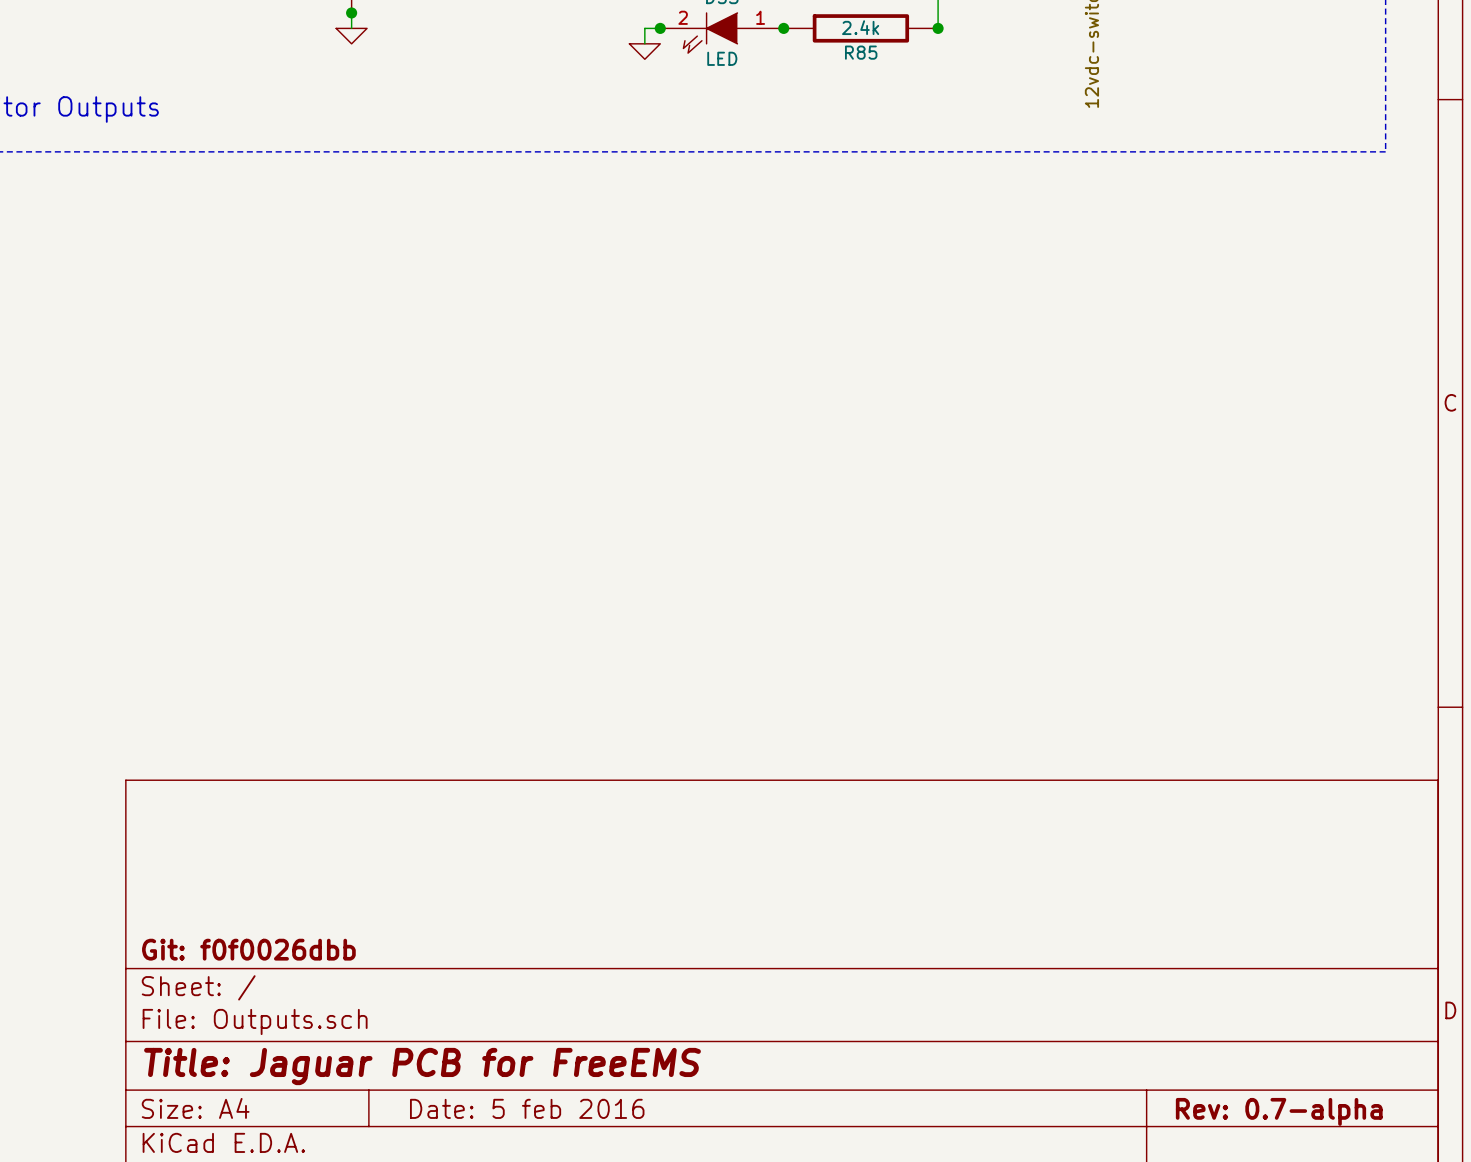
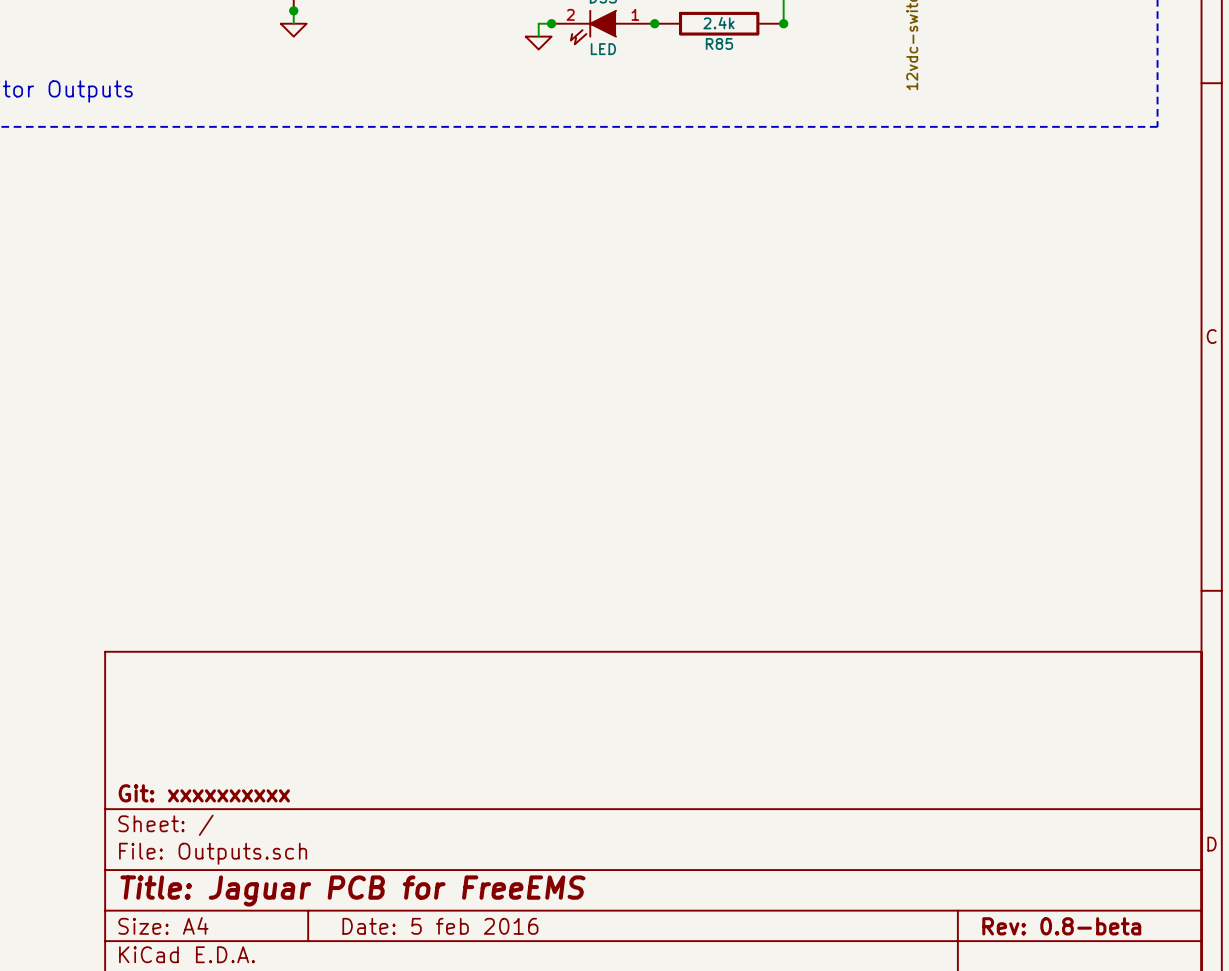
title block: Git: f0f0026dbb (248, 949) -> Git: xxxxxxxxxx (204, 793)
title block: Rev: 0.7-alpha (1279, 1111) -> Rev: 0.8-beta (1061, 926)

